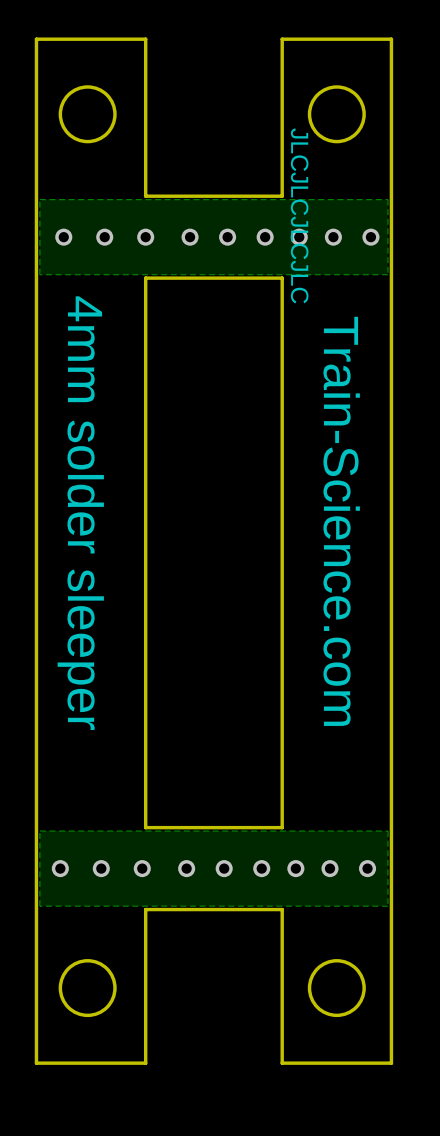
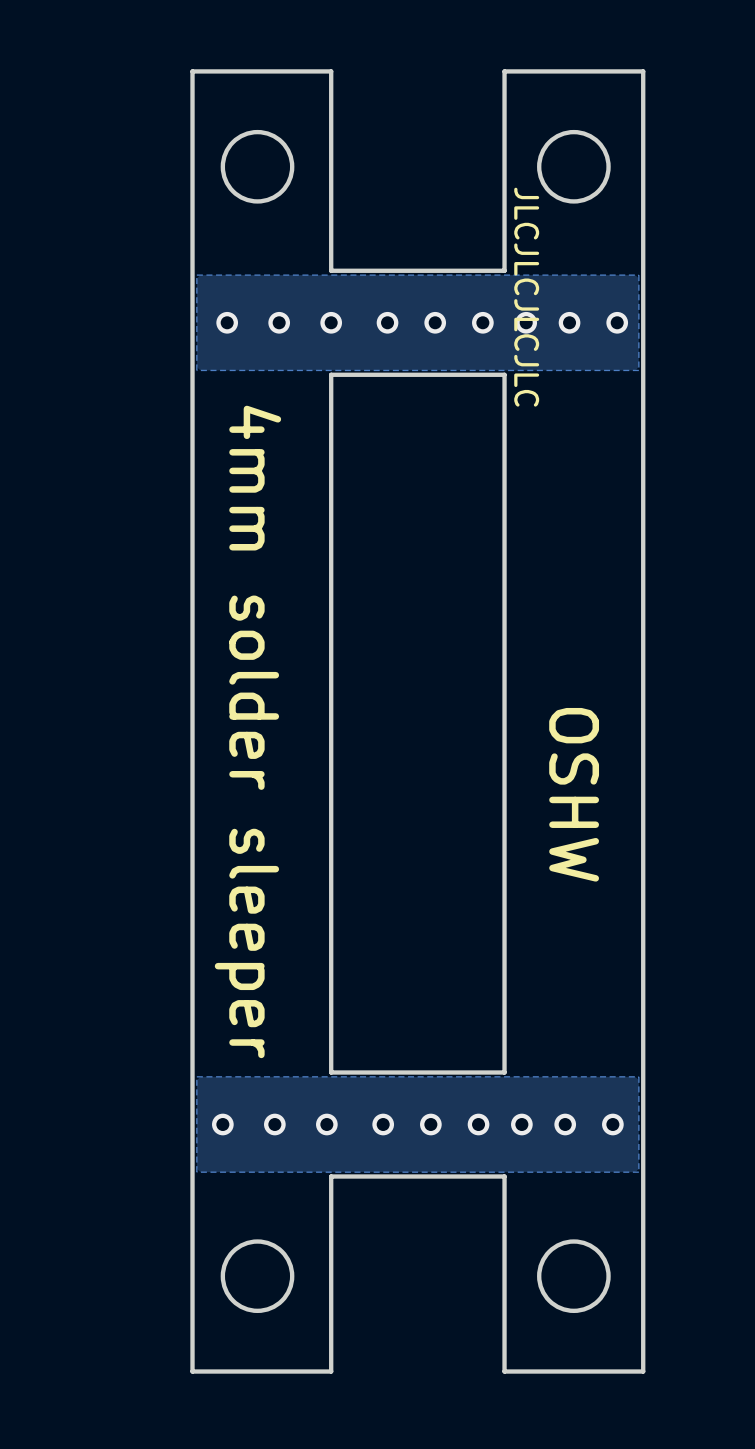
text: Train-Science.com (341, 521) -> none
text: none -> OSHW (574, 794)

